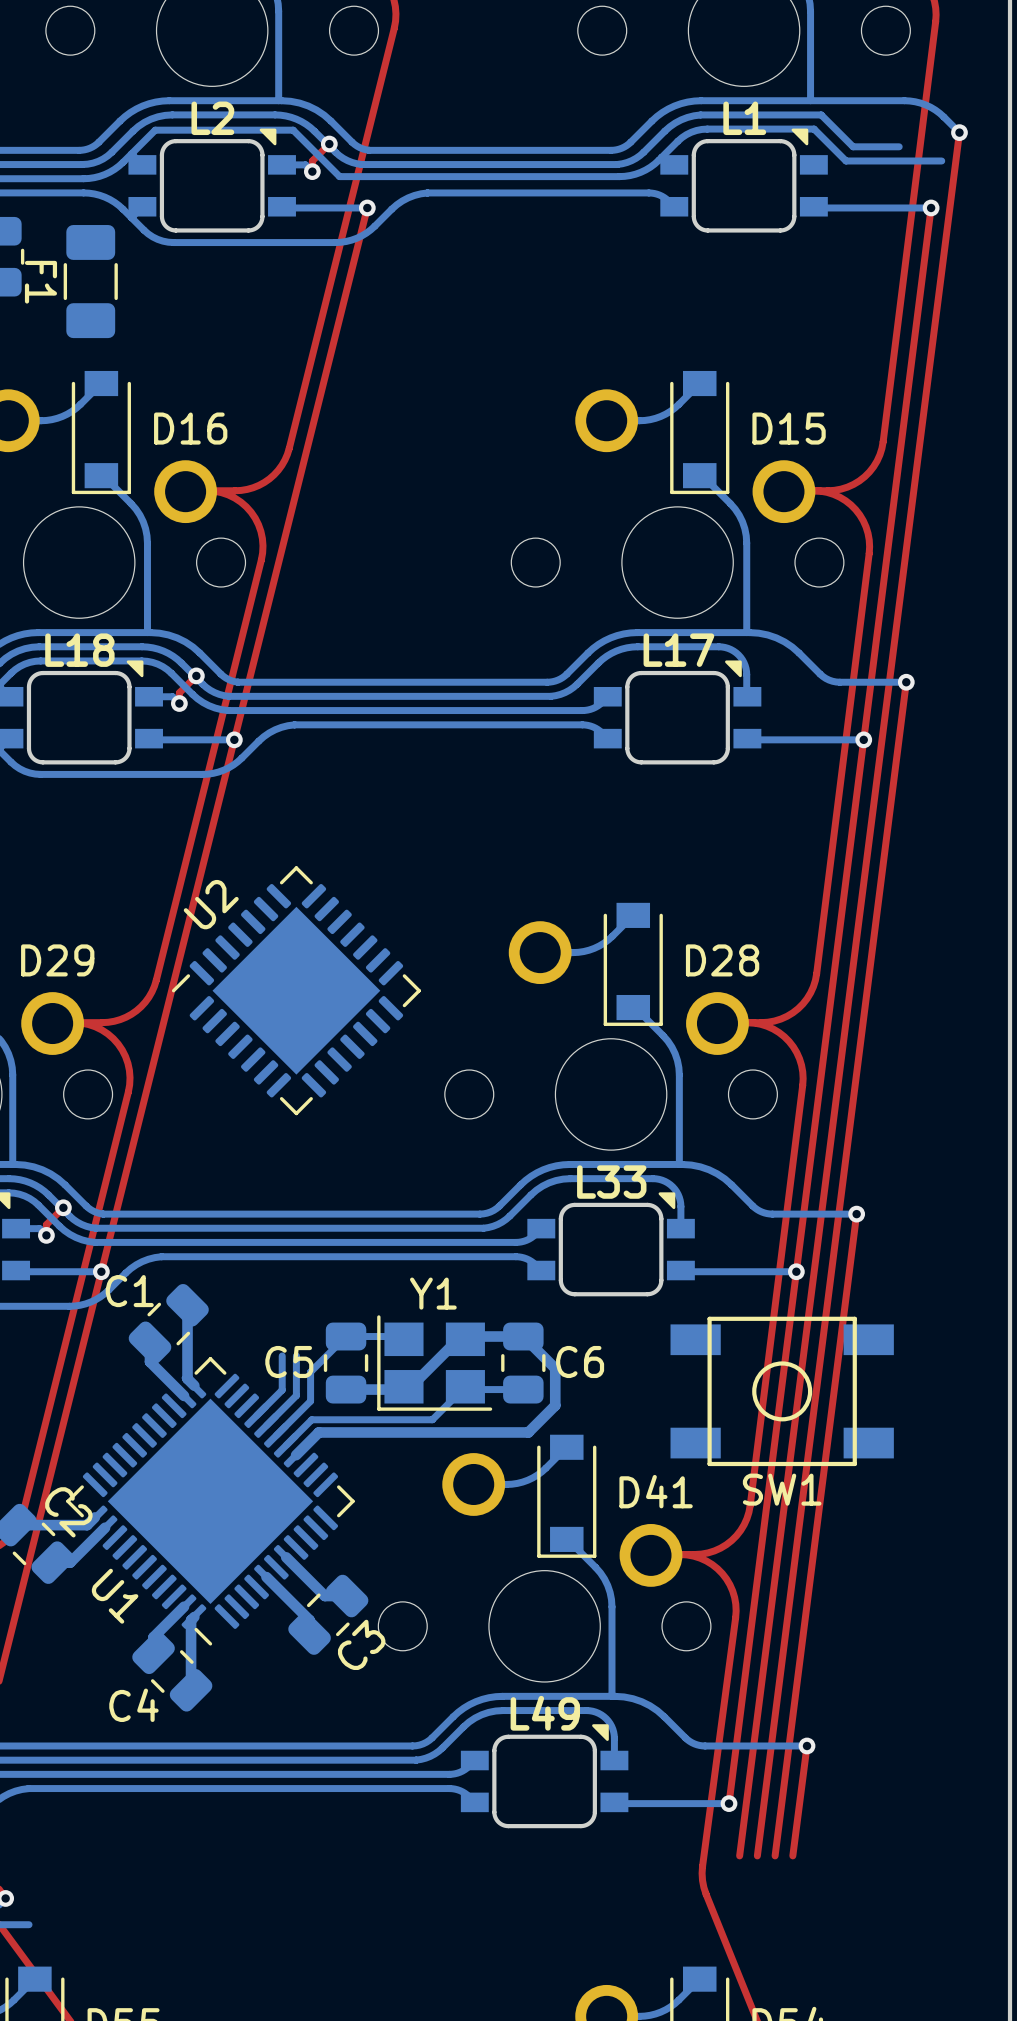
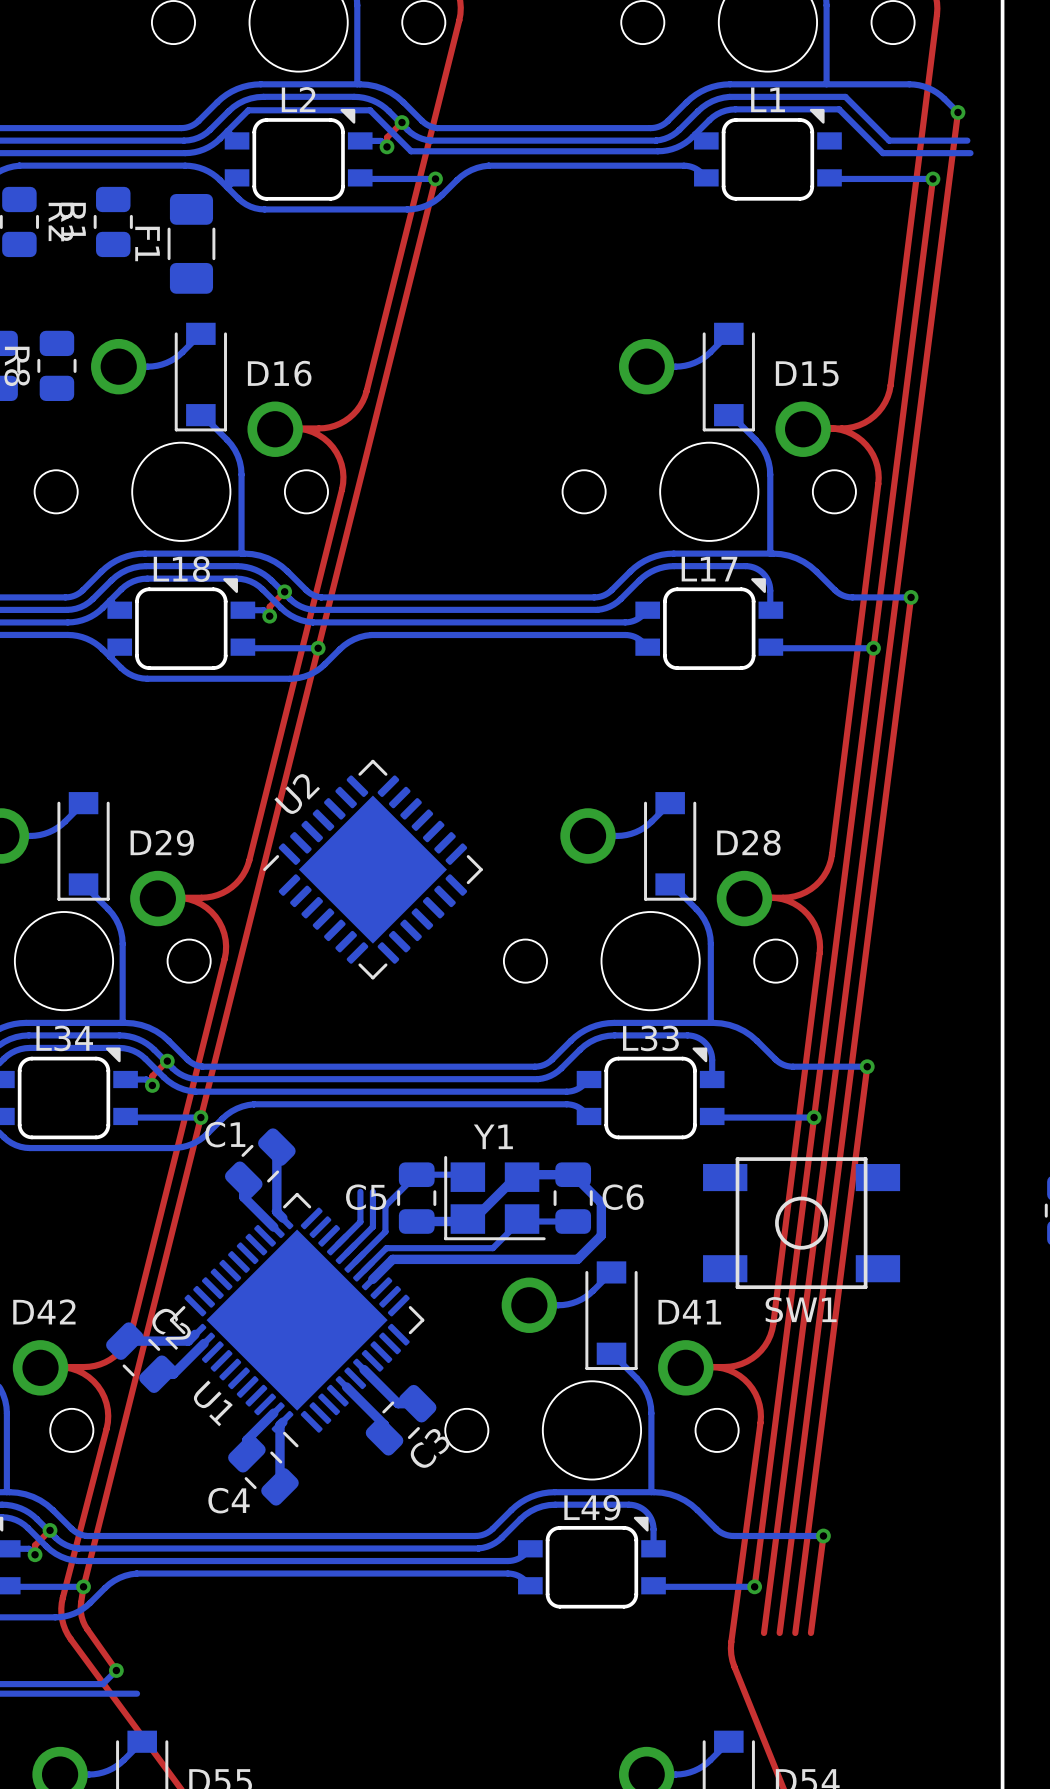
bottom track: (821, 114) (853, 146) (899, 146) -> (836, 96) (845, 96) (889, 140) (967, 140)
bottom track: (814, 129) (846, 160) (941, 160) -> (829, 109) (839, 109) (882, 153) (970, 153)

